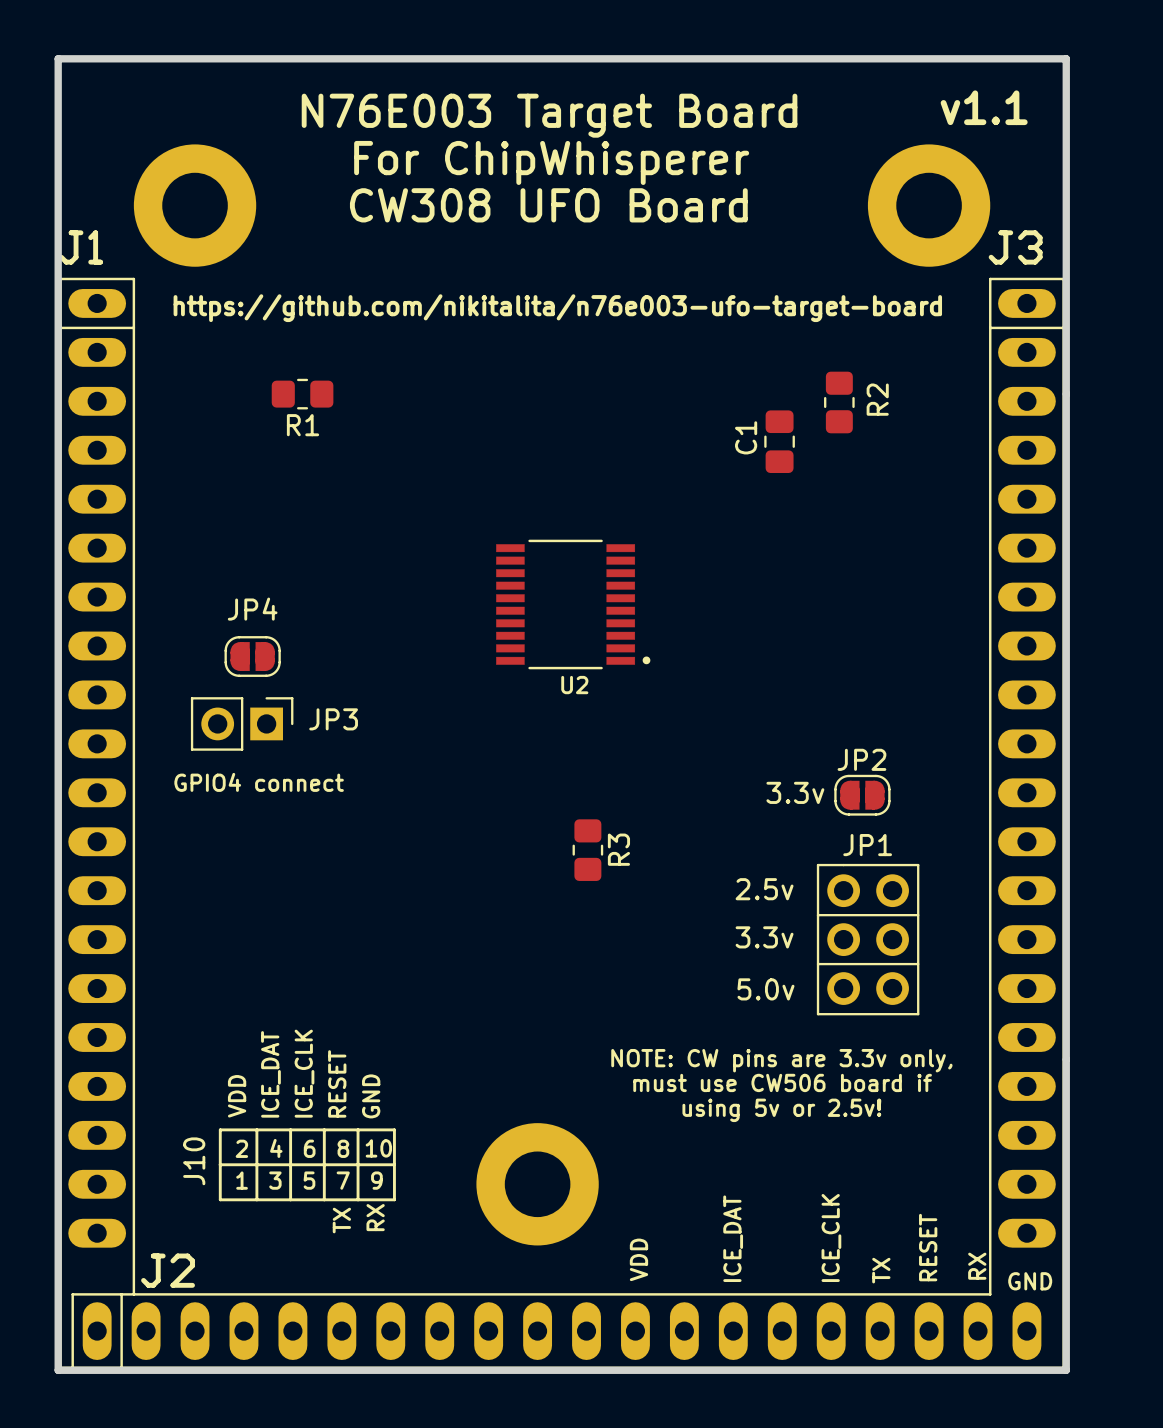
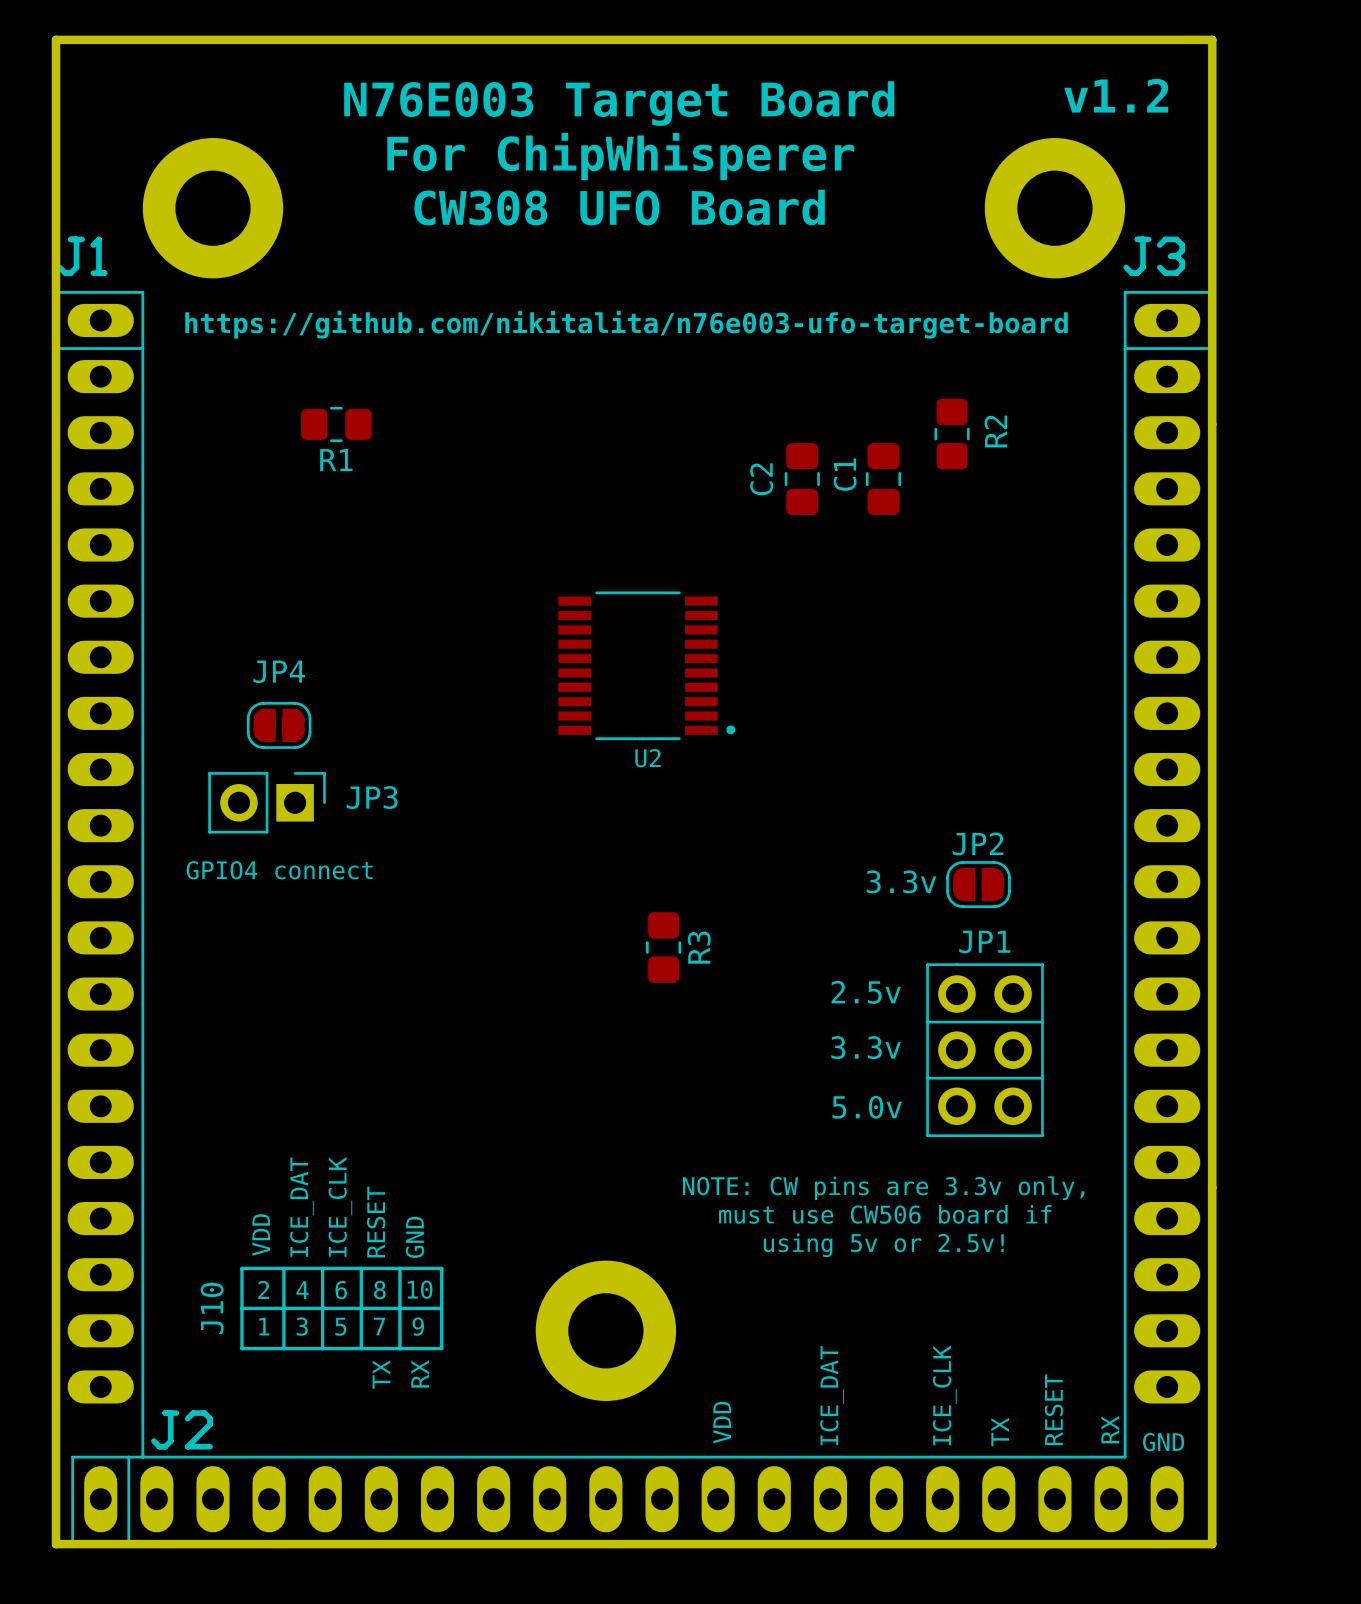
text: v1.1 (984, 107) -> v1.2 (1116, 95)
C2: none -> (802, 479)

